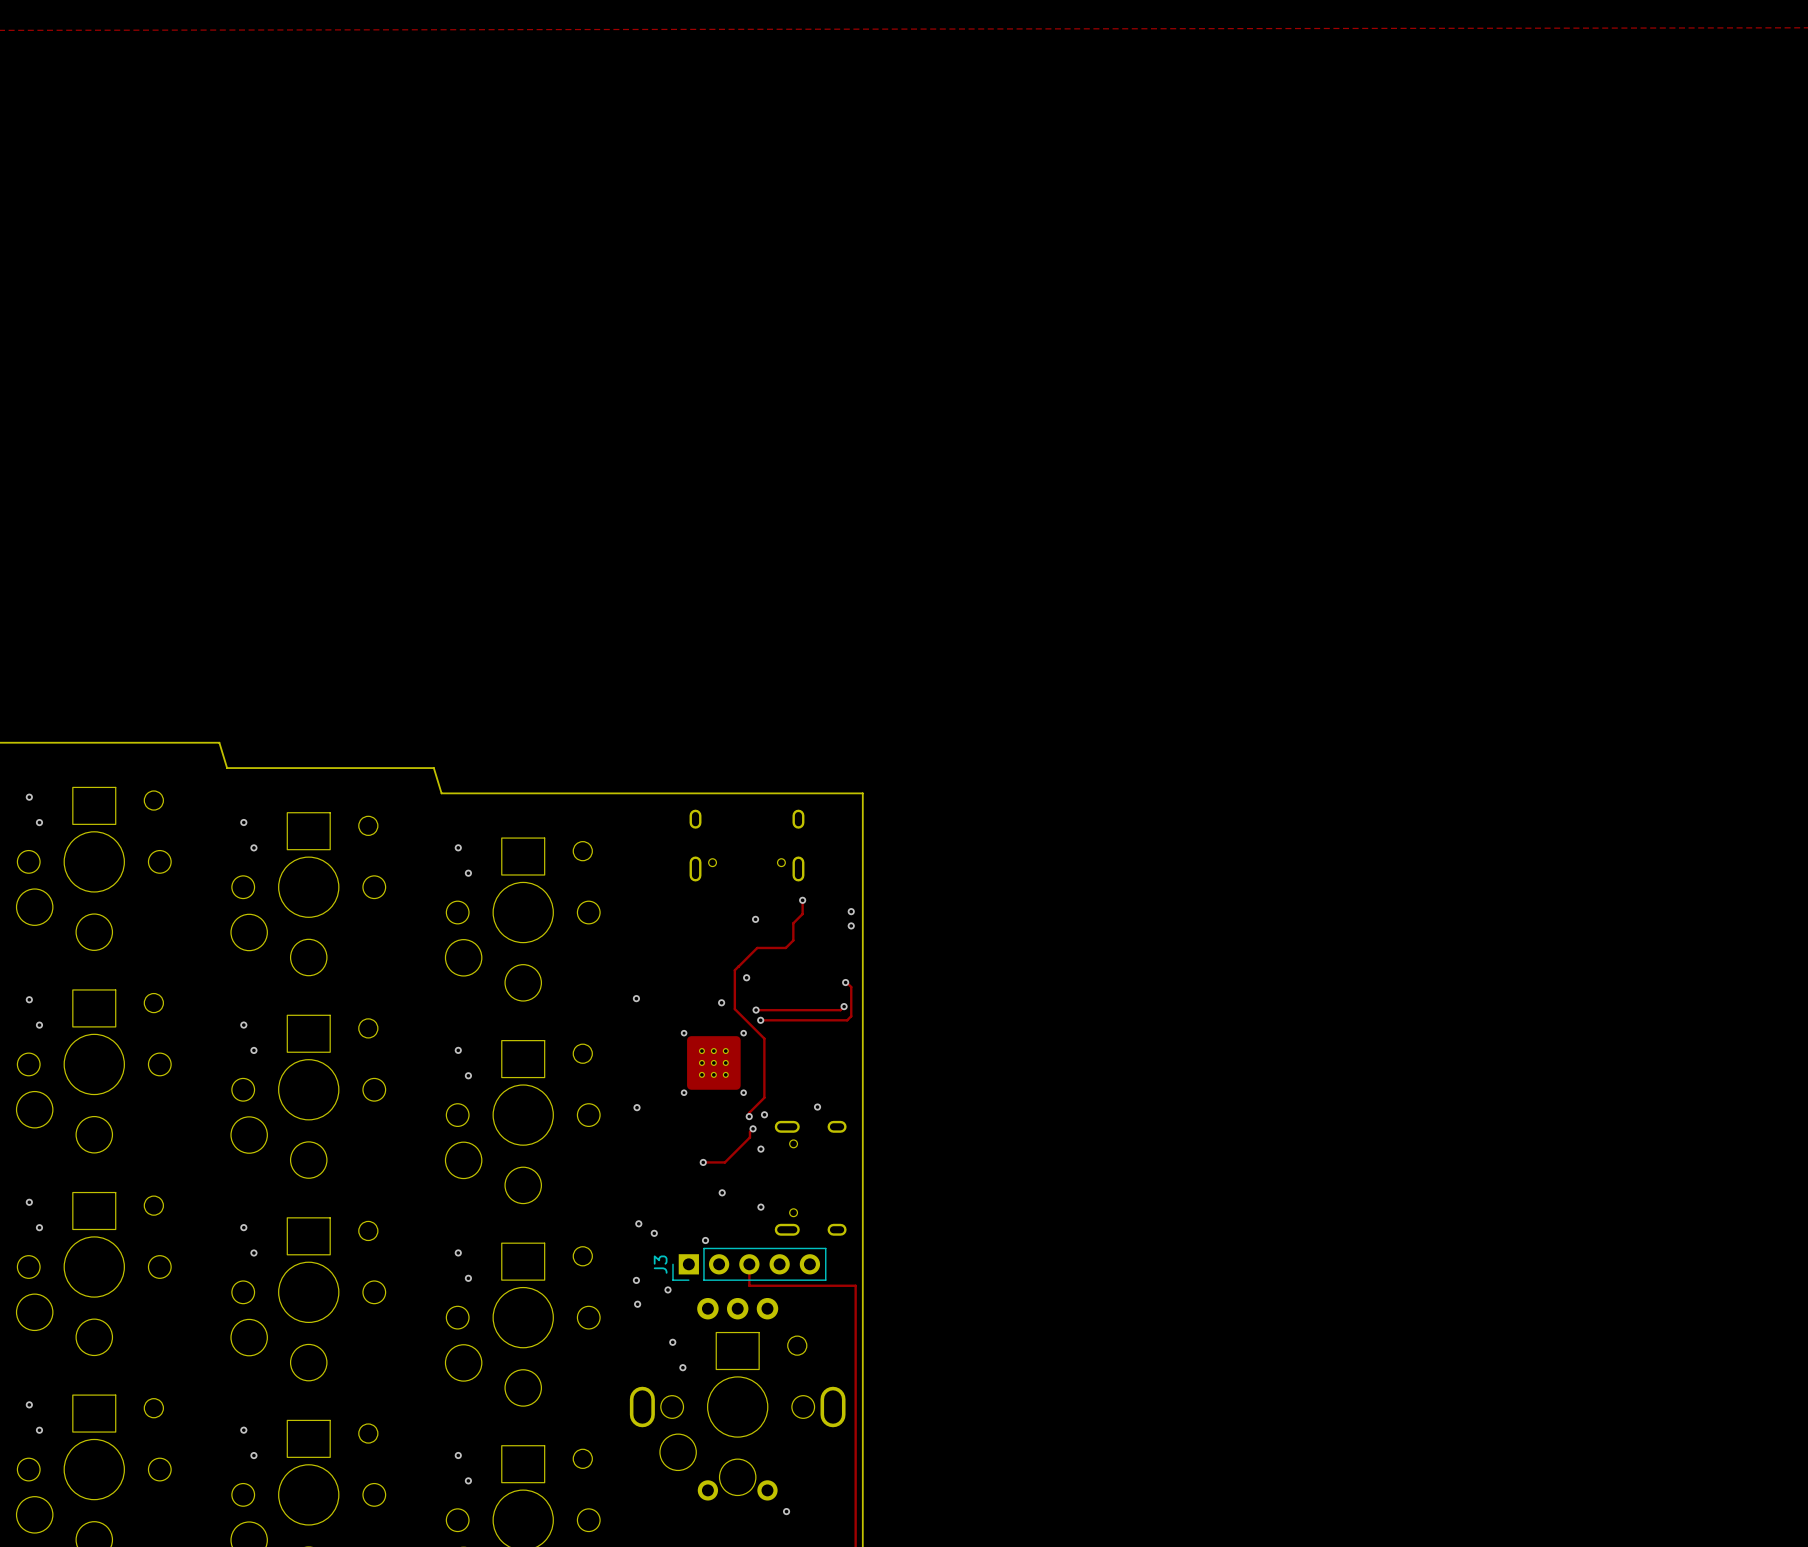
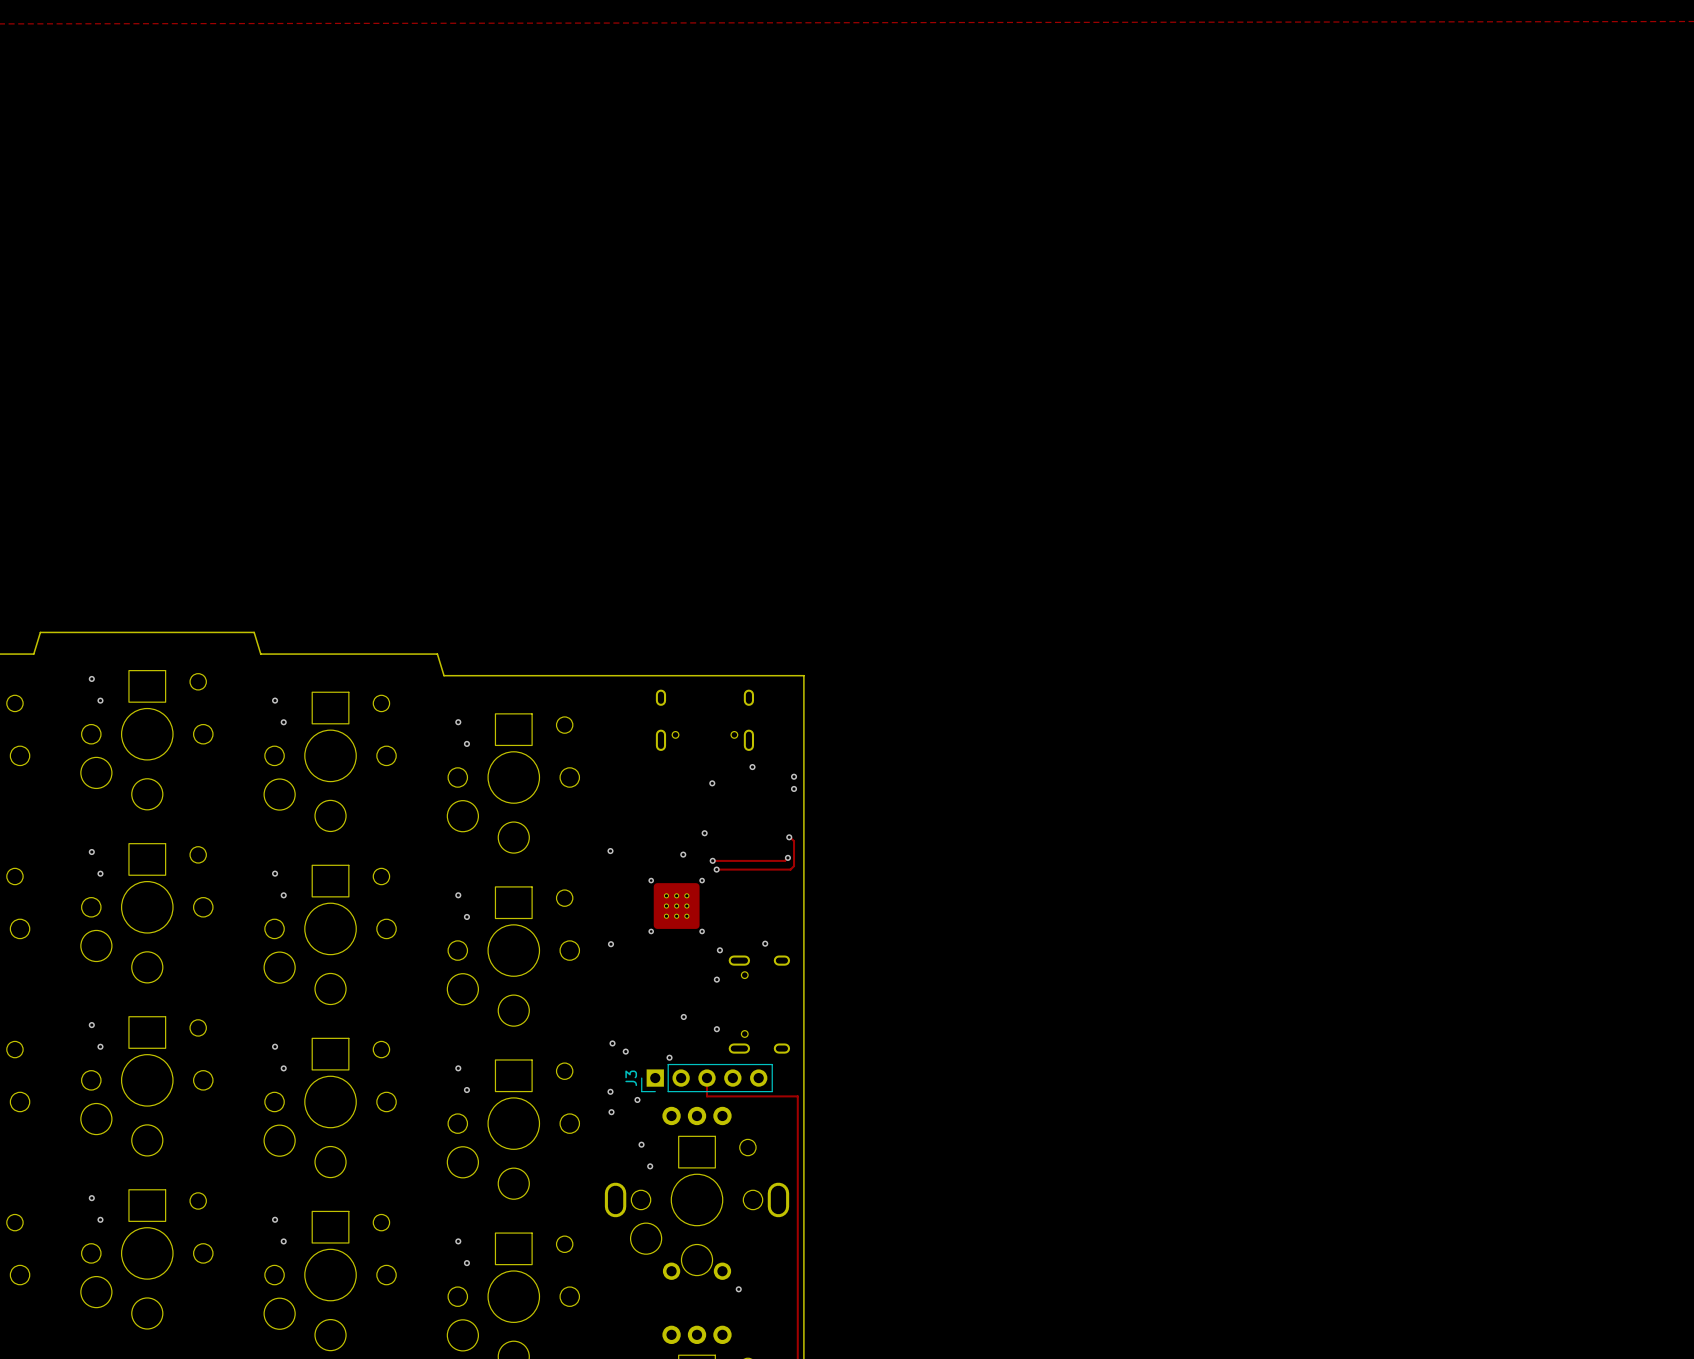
track: (802, 900) (802, 914) (793, 923) (793, 940) (785, 947) (757, 947) (738, 966) -> none
track: (738, 966) (734, 970) (734, 1009) (764, 1038) (764, 1097) (749, 1112) (749, 1116) -> none
via: (749, 1116) -> none
track: (753, 1128) (749, 1131) (749, 1137) (724, 1162) (703, 1162) -> none
via: (753, 1128) -> none
via: (703, 1162) -> none

